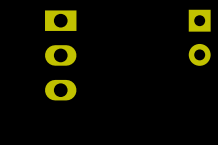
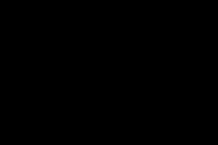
part: (199, 37) -> none
part: (60, 55) -> none

